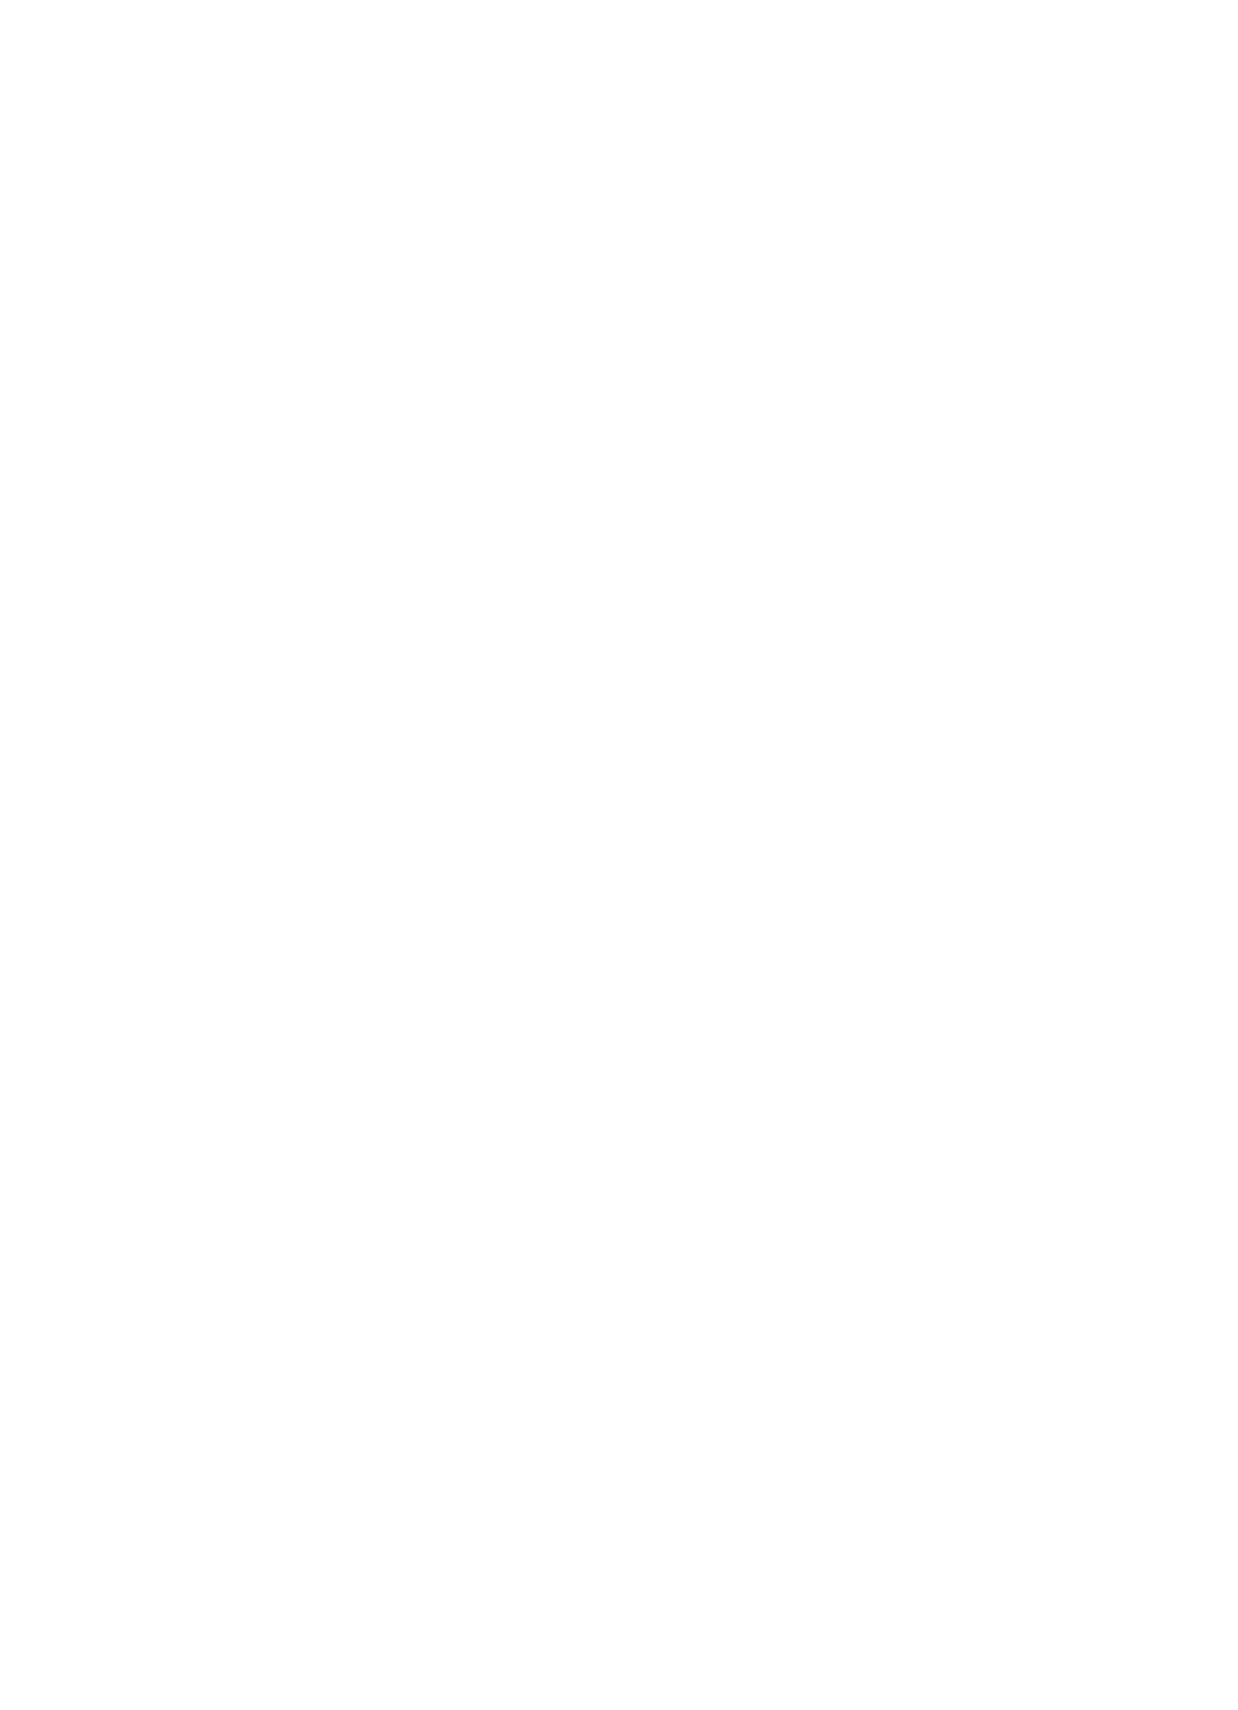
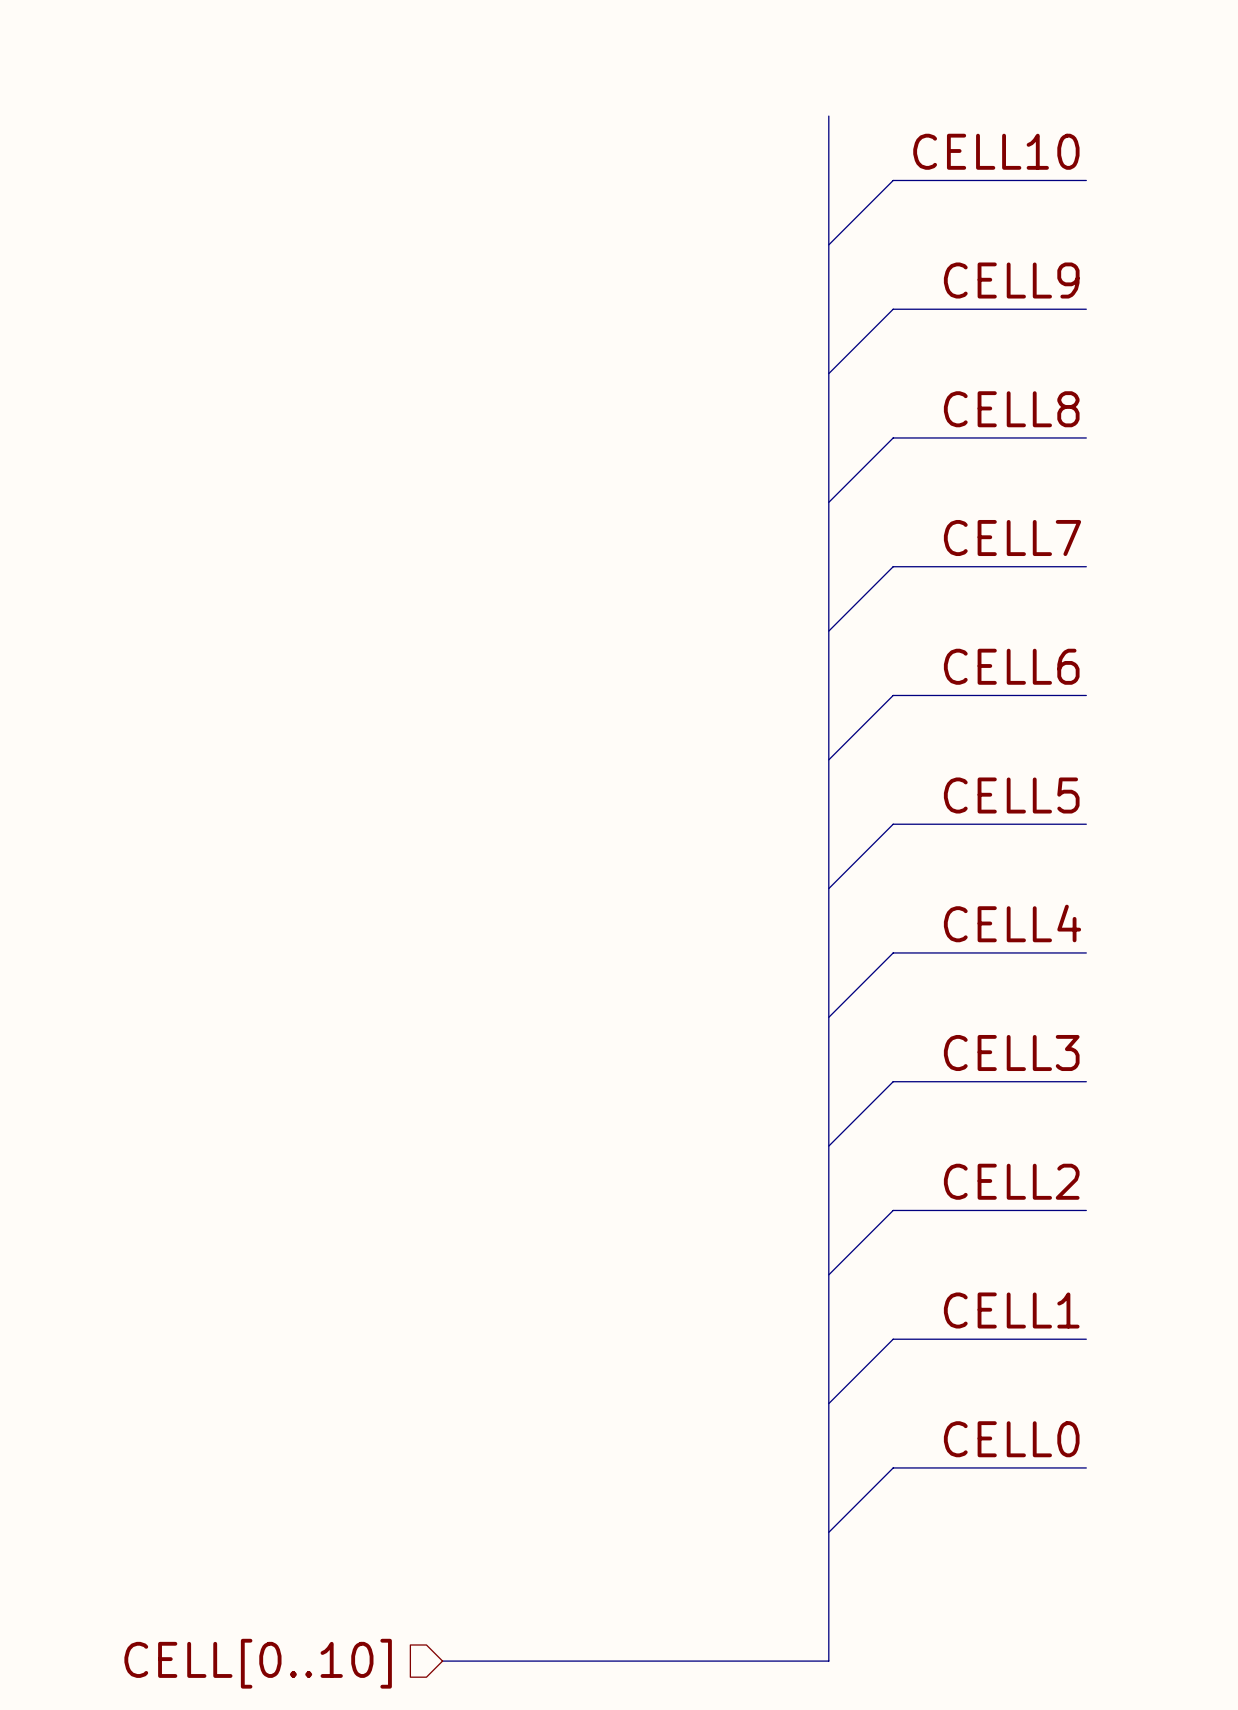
bus: none -> (828, 116) (828, 1661) (442, 1661)
label: none -> CELL10 (996, 151)
wire: none -> (1086, 180) (893, 180) (828, 244)
label: none -> CELL9 (1011, 280)
wire: none -> (1086, 309) (893, 309) (828, 373)
label: none -> CELL8 (1011, 409)
wire: none -> (1086, 437) (893, 437) (828, 502)
label: none -> CELL7 (1012, 538)
wire: none -> (1086, 566) (893, 566) (828, 631)
label: none -> CELL6 (1011, 666)
wire: none -> (1086, 695) (893, 695) (828, 759)
label: none -> CELL5 (1011, 795)
wire: none -> (1086, 824) (893, 824) (828, 888)
label: none -> CELL4 (1012, 923)
wire: none -> (1086, 952) (893, 952) (828, 1017)
label: none -> CELL3 (1011, 1052)
wire: none -> (1086, 1081) (893, 1081) (828, 1146)
label: none -> CELL2 (1011, 1181)
wire: none -> (1086, 1210) (893, 1210) (828, 1274)
label: none -> CELL1 (1011, 1310)
wire: none -> (1086, 1339) (893, 1339) (828, 1403)
label: none -> CELL0 (1011, 1439)
wire: none -> (1086, 1467) (893, 1467) (828, 1532)
hierarchical label: none -> CELL[0..10] (258, 1663)

